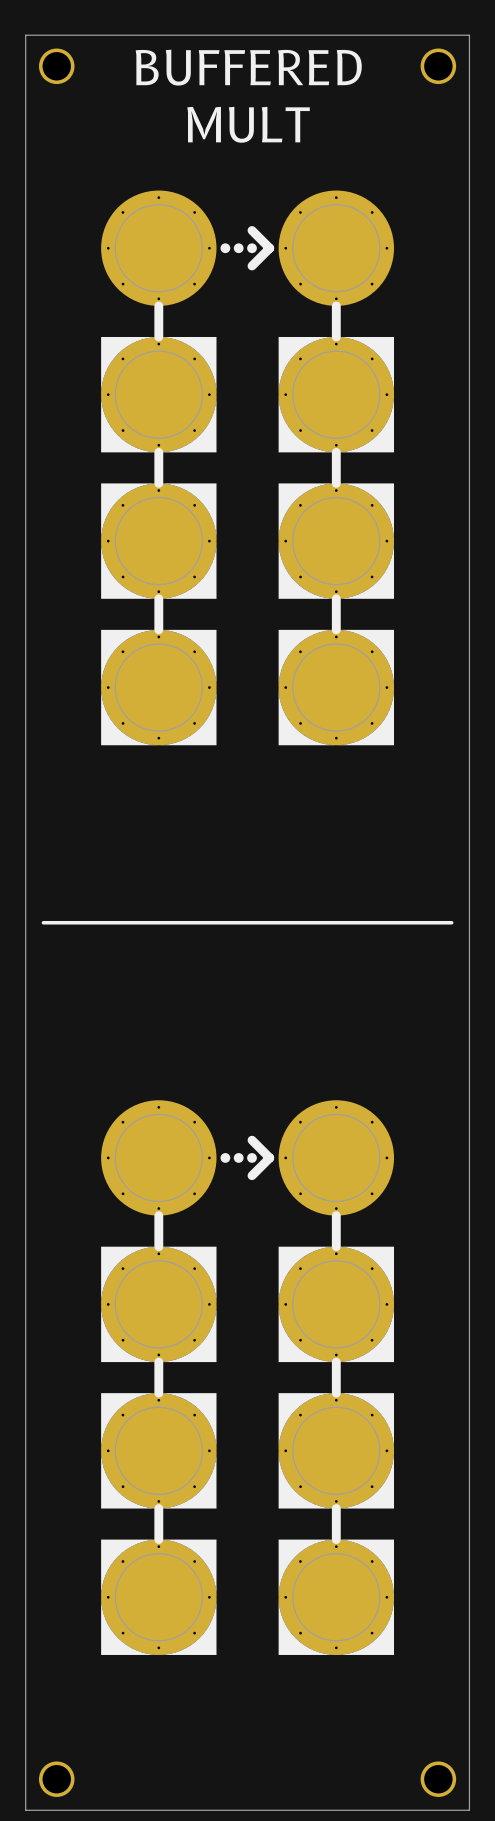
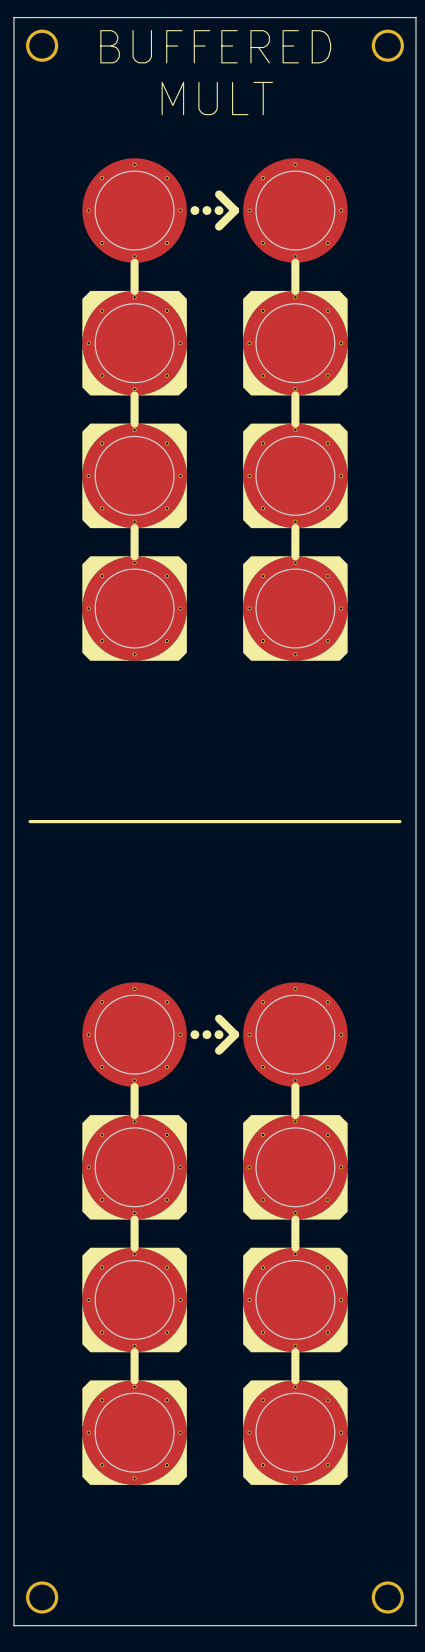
part footprint: [101, 336, 217, 453] -> [82, 290, 187, 396]
part footprint: [278, 336, 395, 453] -> [243, 290, 348, 396]
part footprint: [101, 483, 217, 599] -> [82, 423, 187, 529]
part footprint: [278, 483, 395, 599] -> [243, 423, 348, 529]
part footprint: [101, 629, 217, 746] -> [82, 556, 187, 661]
part footprint: [278, 629, 395, 746] -> [243, 556, 348, 661]
part footprint: [101, 1246, 217, 1363] -> [82, 1115, 187, 1220]
part footprint: [278, 1246, 395, 1363] -> [243, 1115, 348, 1220]
part footprint: [101, 1393, 217, 1509] -> [82, 1247, 187, 1353]
part footprint: [278, 1393, 395, 1509] -> [243, 1247, 348, 1353]
part footprint: [101, 1539, 217, 1655] -> [82, 1380, 187, 1485]
part footprint: [278, 1539, 395, 1655] -> [243, 1380, 348, 1485]

